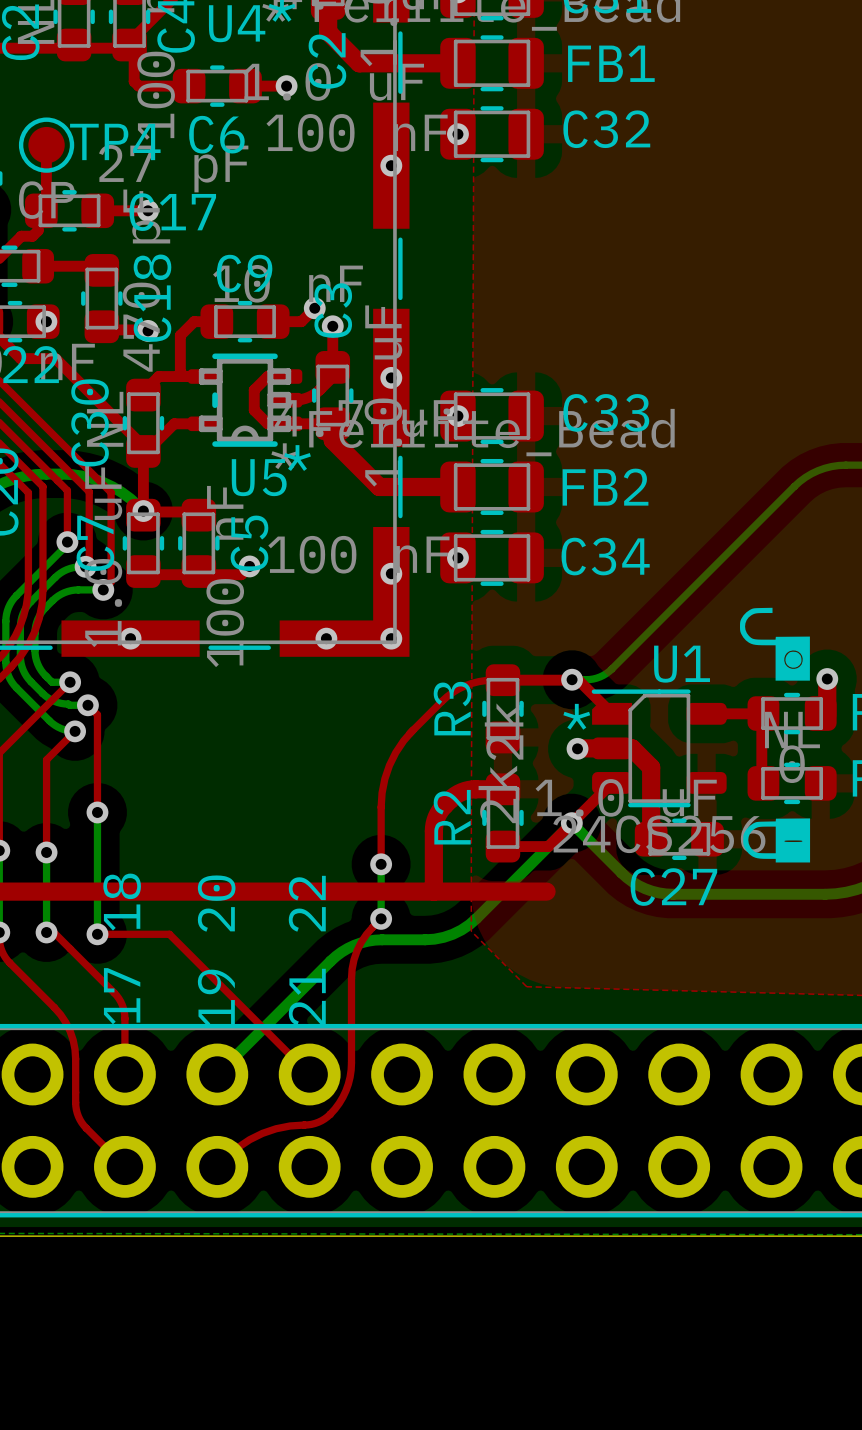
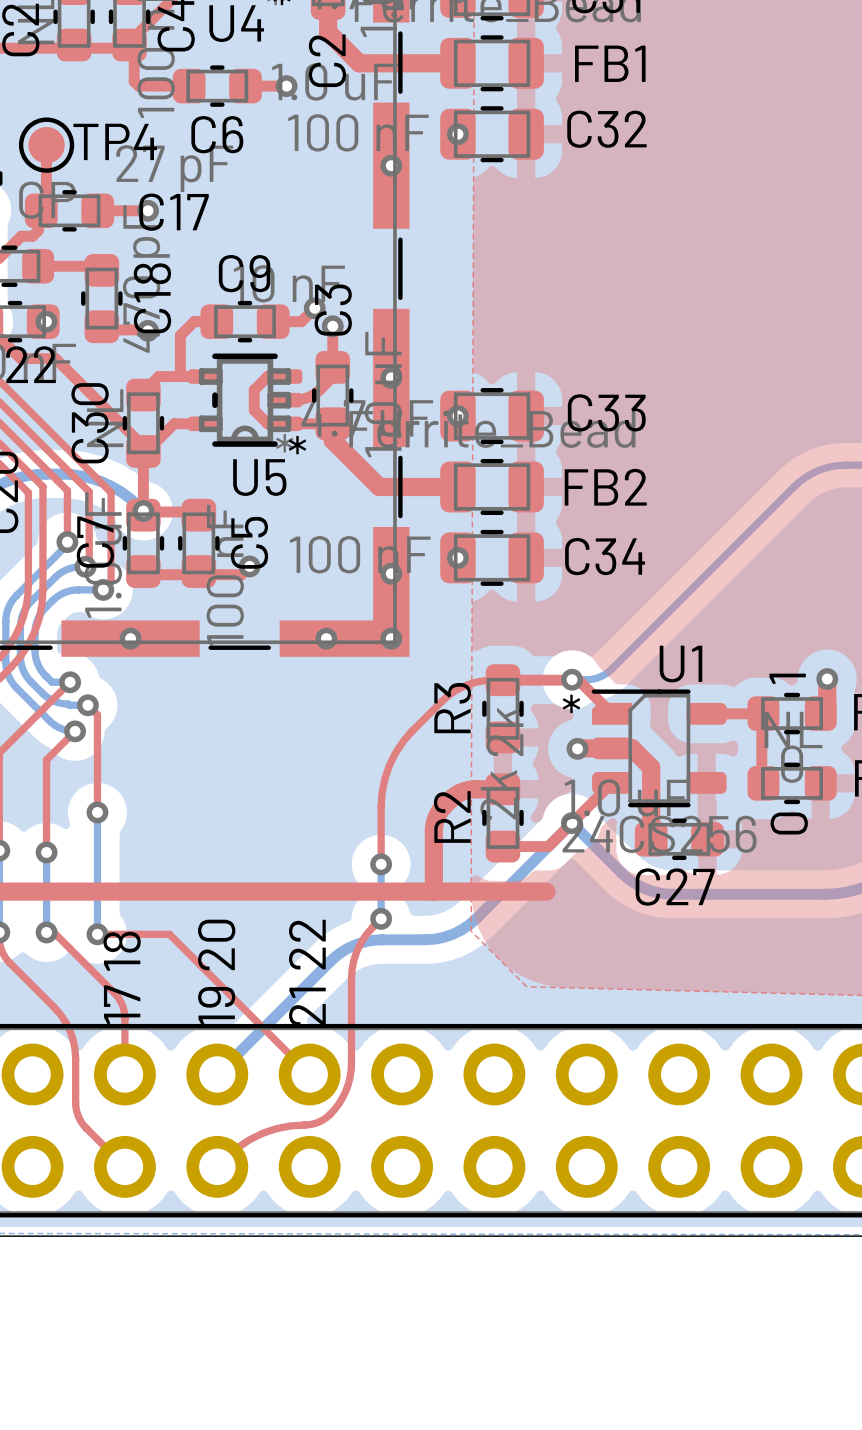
drawing: [739, 607, 810, 681] -> none
text: none -> 1 (787, 678)
drawing: [743, 818, 811, 863] -> none
text: none -> 0 (789, 823)

